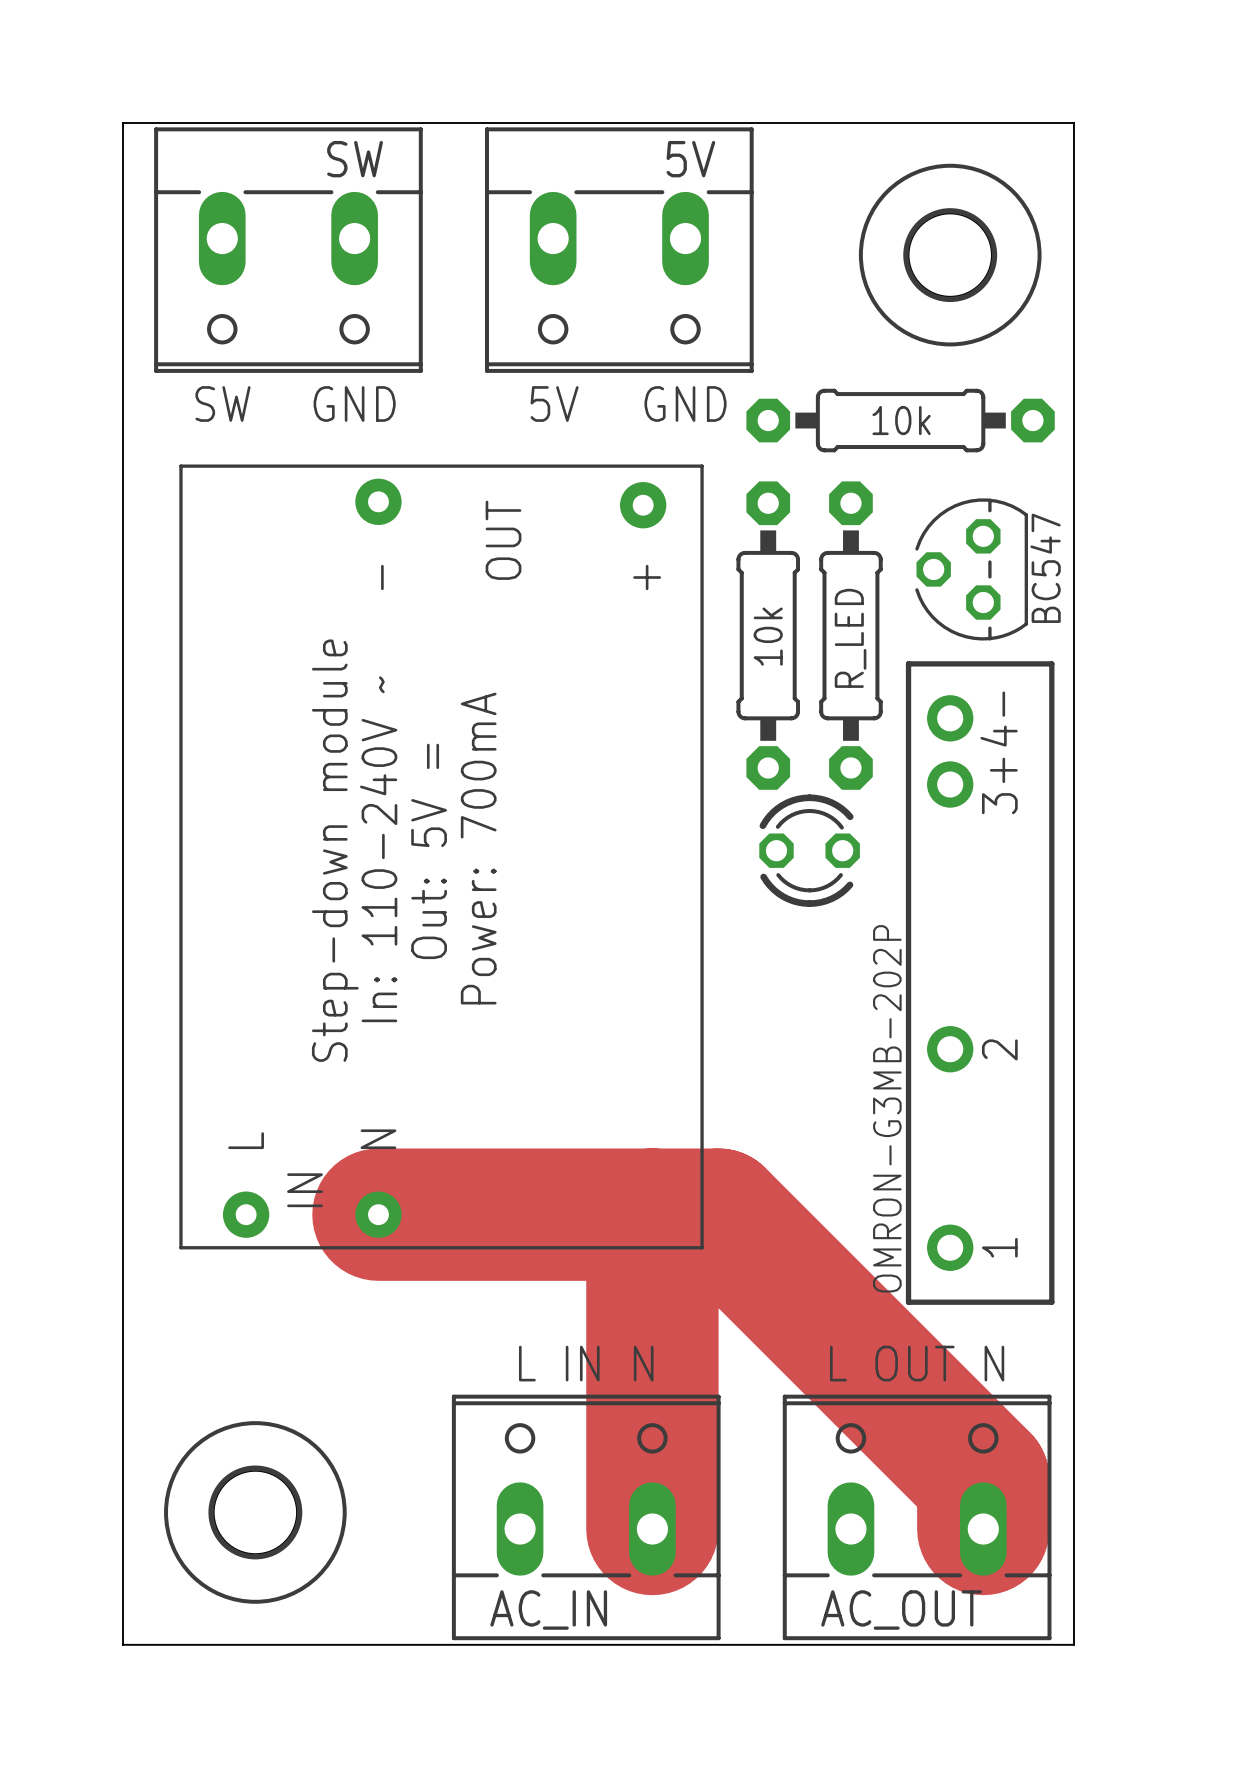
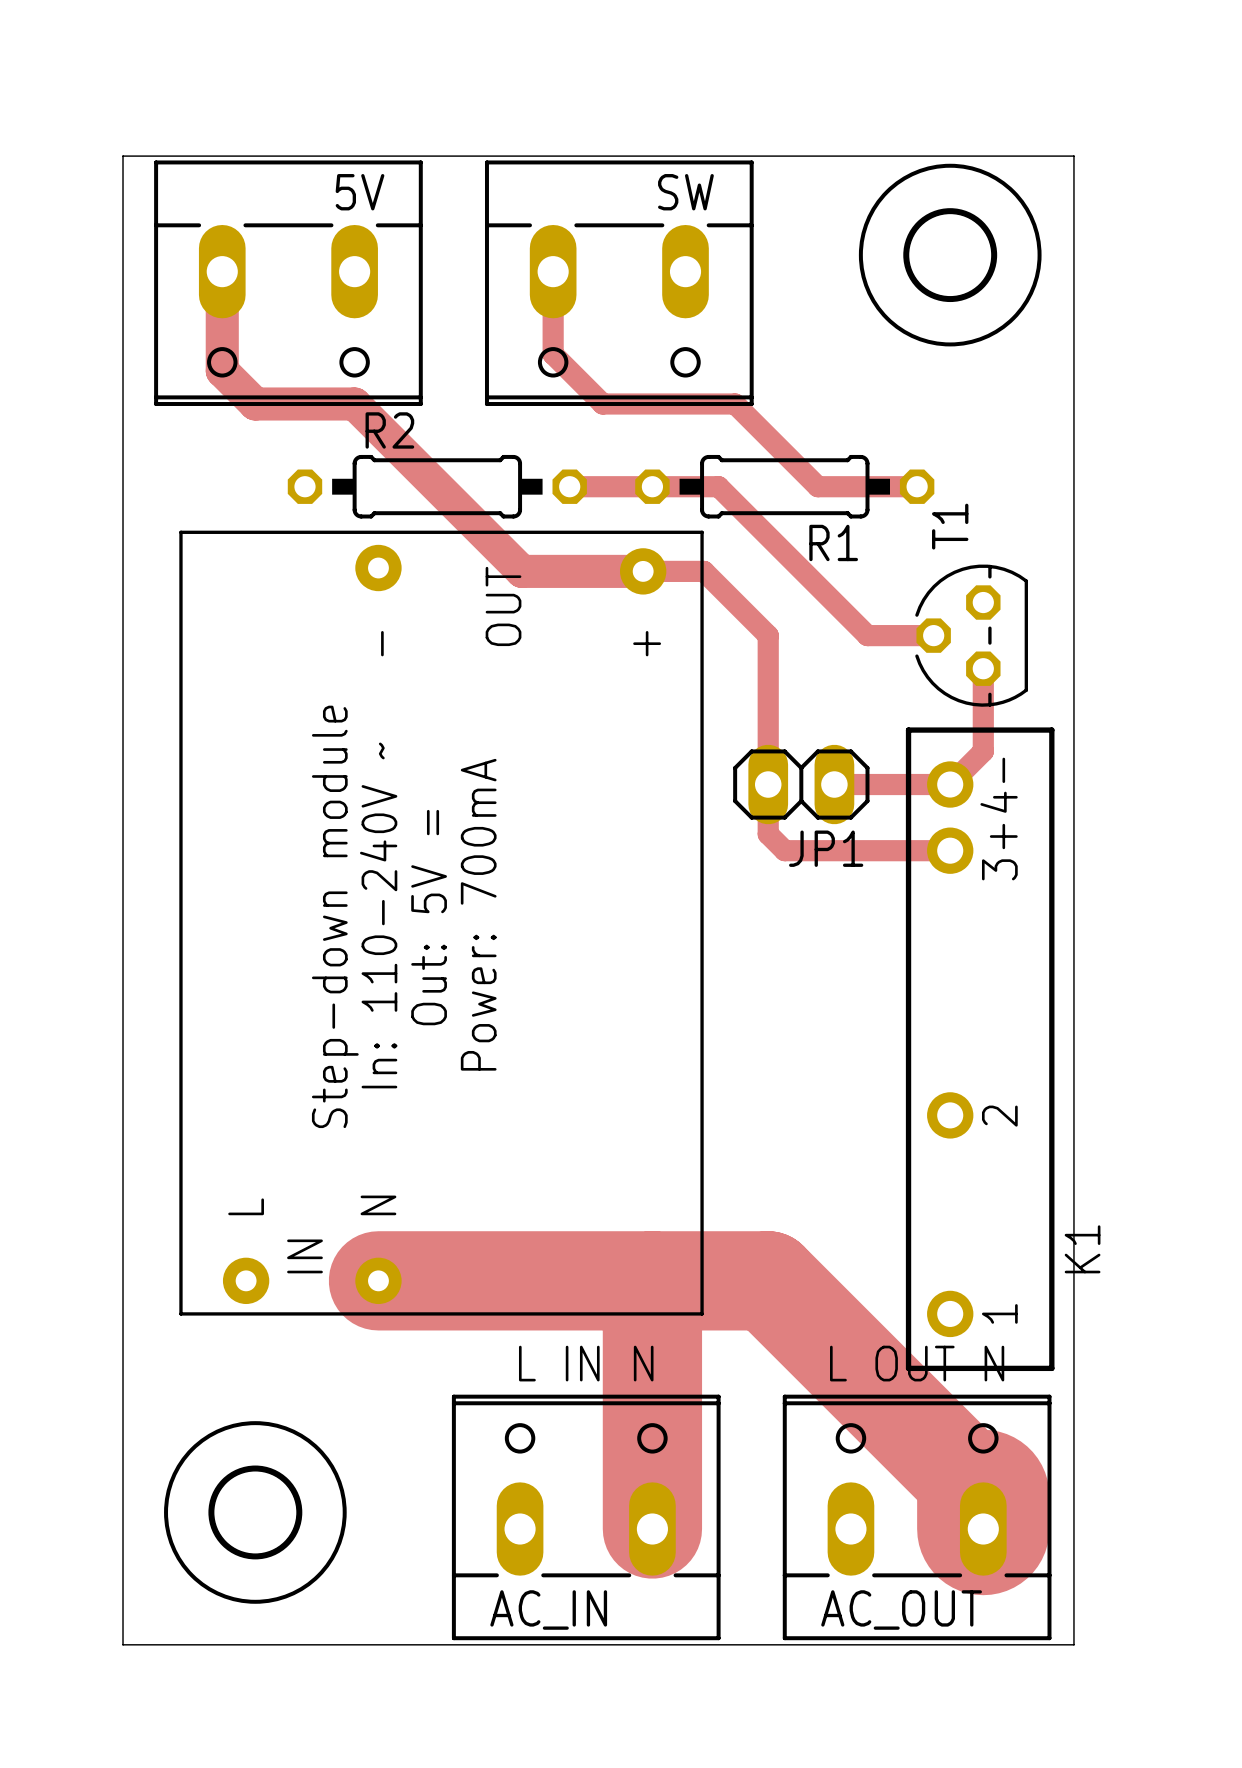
board edge: (123, 156) (123, 123) (1073, 123) (1073, 156) -> (123, 156) (1073, 156)
SW position: (288, 250) -> (619, 283)
5V position: (619, 250) -> (288, 283)
track: none -> (222, 271) (222, 370) (255, 403) (354, 403) (522, 571) (704, 571) (768, 635) (768, 834) (784, 850) (950, 850)
track: none -> (553, 271) (553, 354) (602, 403) (735, 403) (817, 486) (917, 486)
text: SW (222, 403) -> none
text: GND (354, 403) -> none
text: 5V (554, 403) -> none
text: GND (685, 403) -> none
part: 10k (900, 420) -> none
R2: none -> (437, 486)
track: none -> (569, 486) (718, 486) (867, 635) (933, 635)
R1: none -> (784, 486)
part: BC547 (971, 569) -> none
part: 10k (768, 635) -> none
R_LED: (850, 635) -> none
T1: none -> (971, 635)
track: none -> (983, 668) (983, 751) (950, 784) (834, 784)
JP1: none -> (801, 784)
part: (809, 850) -> none
part position: (441, 856) -> (441, 923)
part: OMRON-G3MB-202P (980, 983) -> none
K1: none -> (980, 1049)
track: (378, 1214) (718, 1214) (983, 1479) (983, 1495) -> (378, 1280) (768, 1280) (983, 1495)
track width: thick (652, 1280) (652, 1529) -> thin (652, 1280) (652, 1529)

